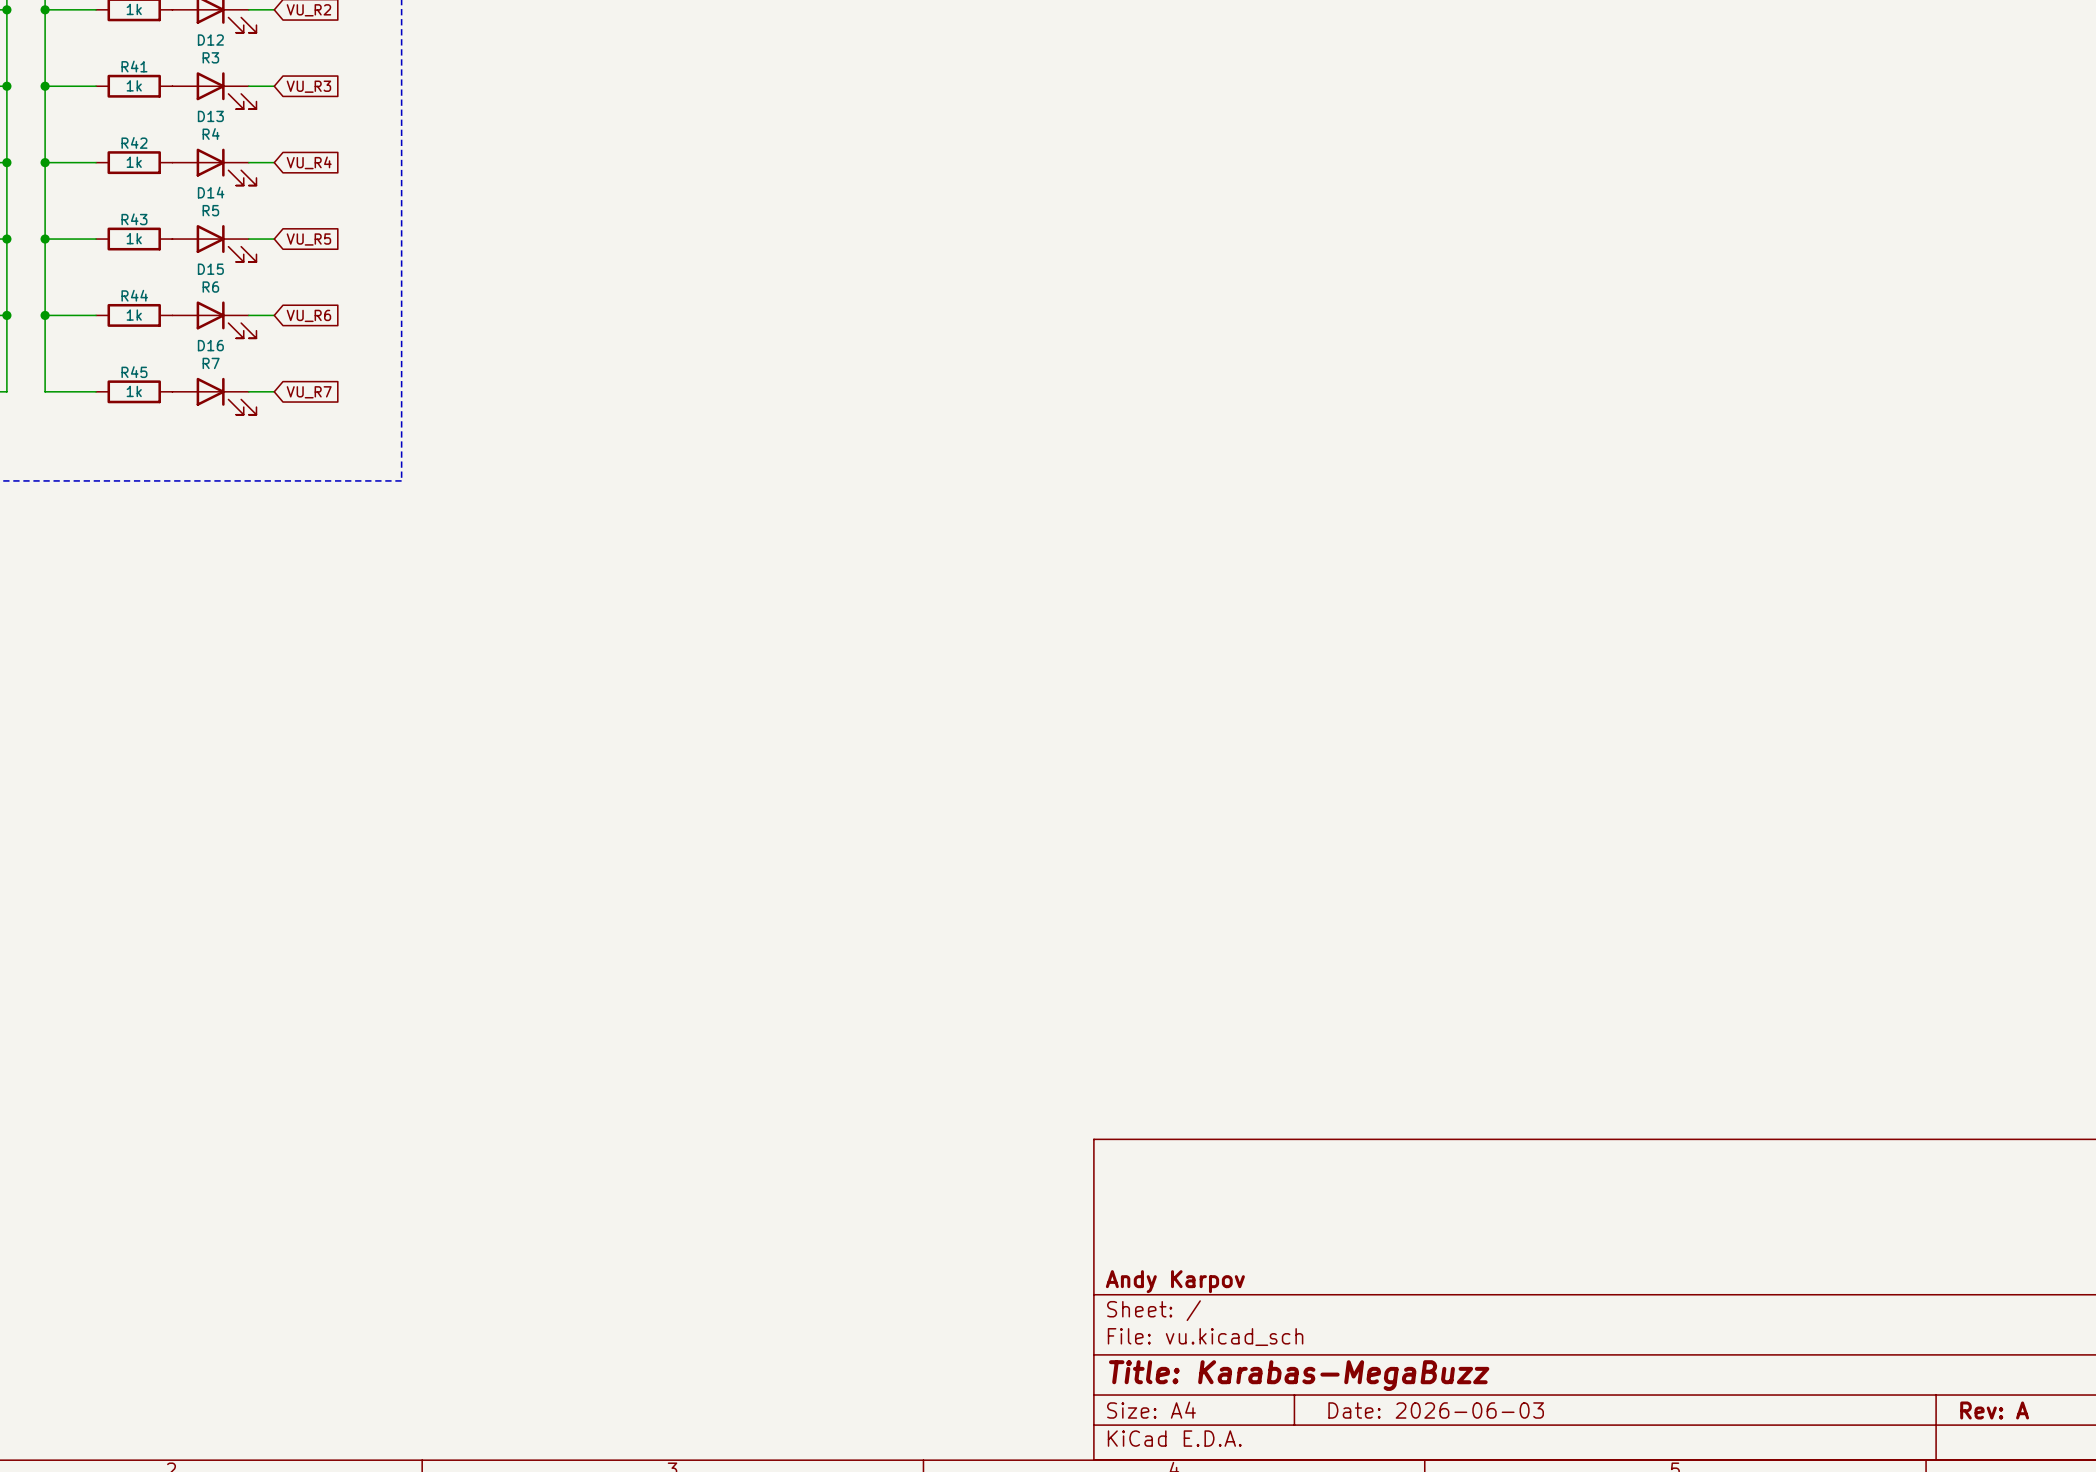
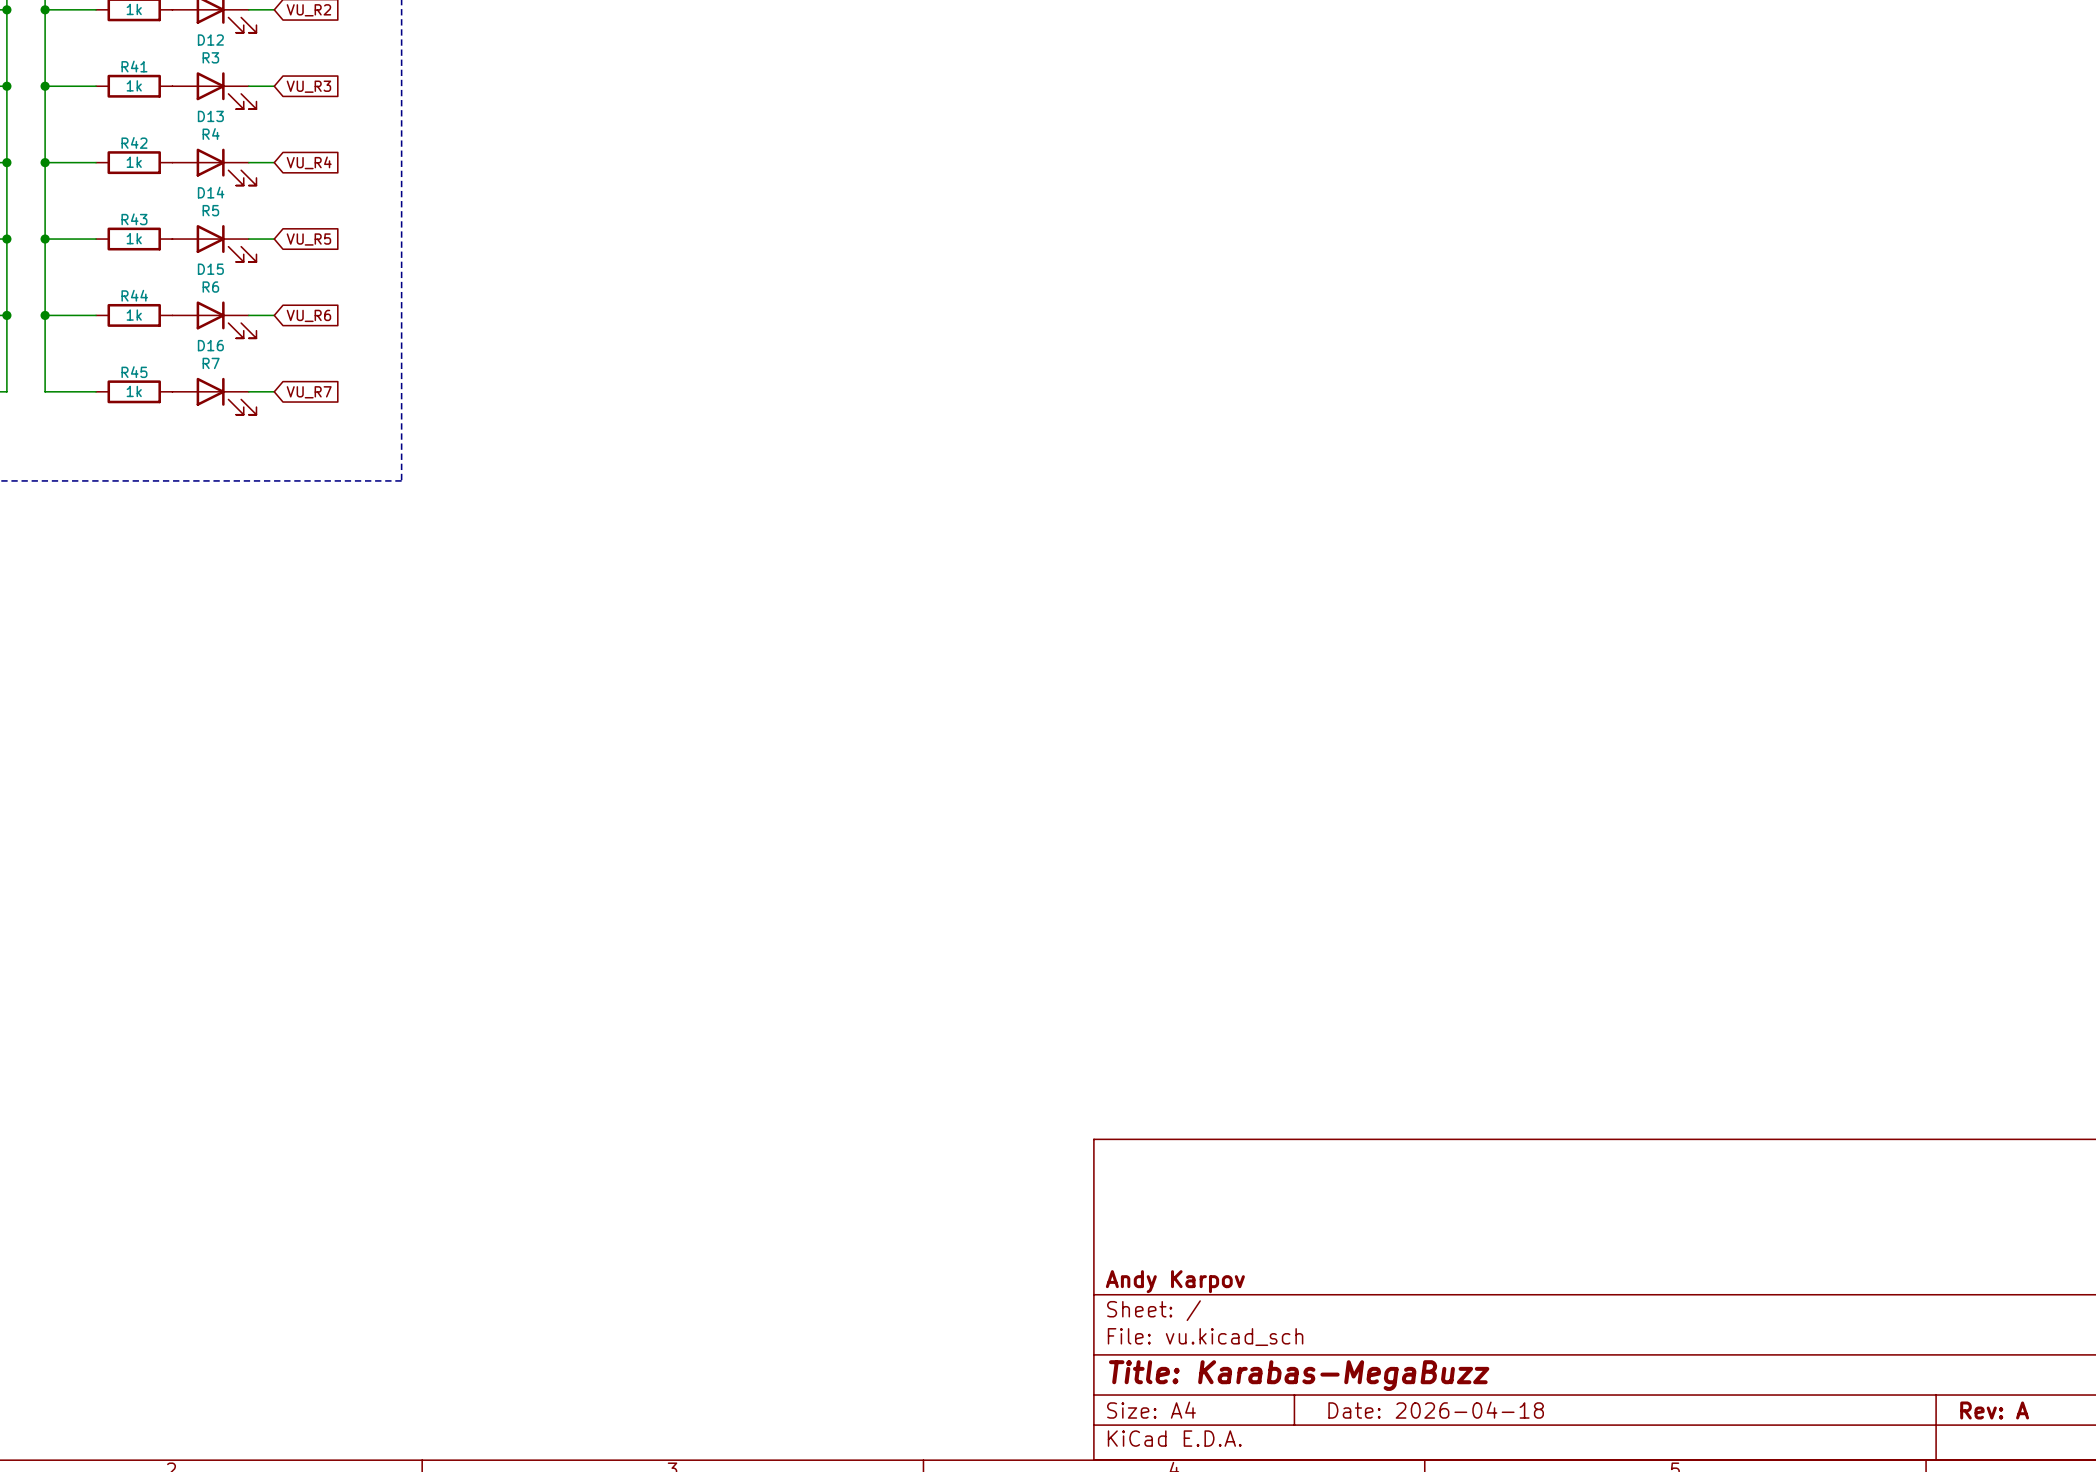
title block: Date: 2026-06-03 (1436, 1410) -> Date: 2026-04-18 (1436, 1410)

